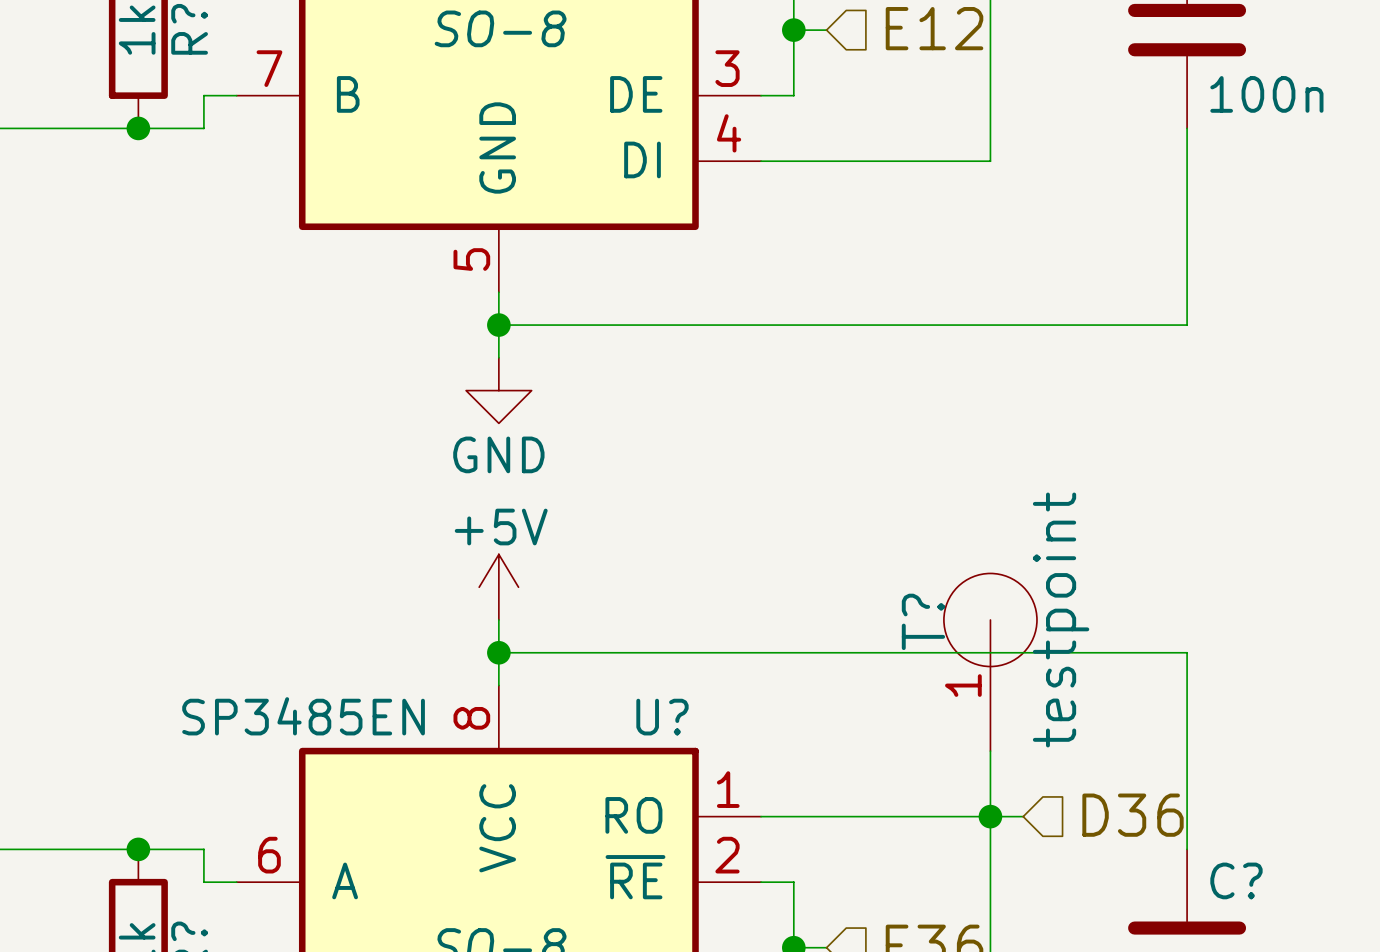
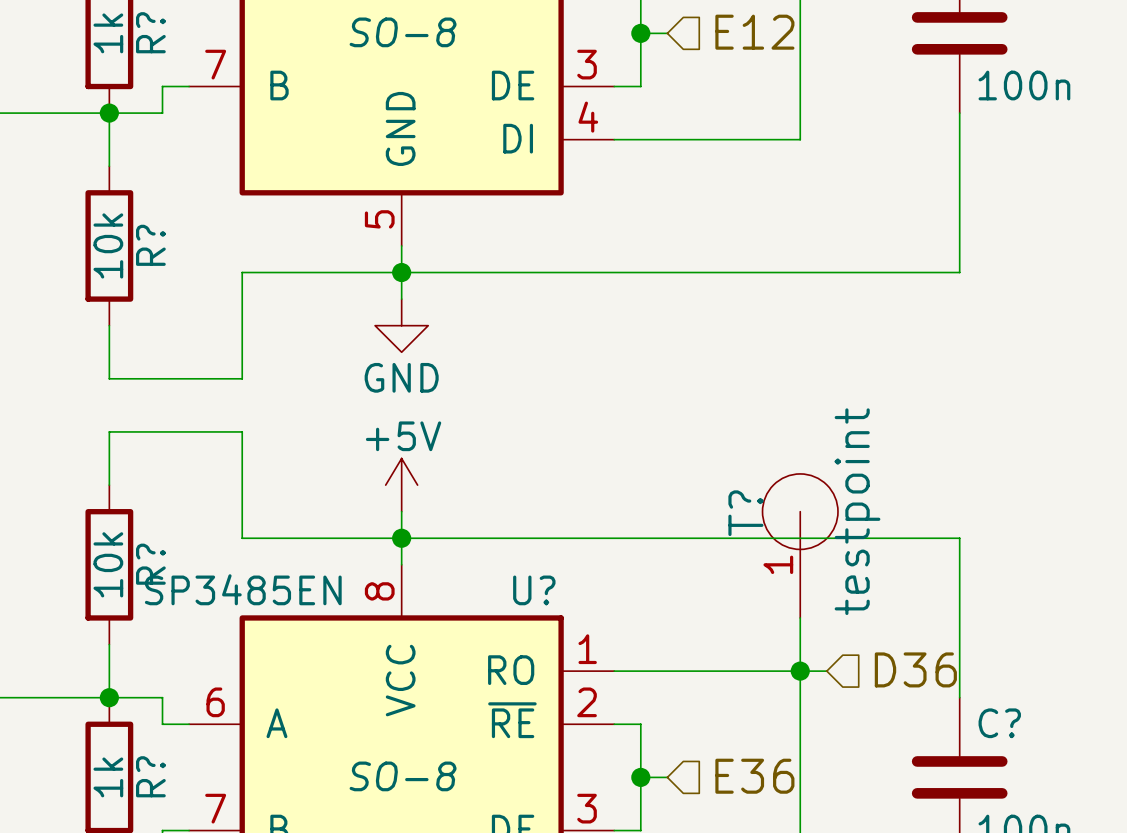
wire: none -> (109, 113) (109, 166)
R?: none -> 10k (109, 245)
wire: none -> (401, 272) (242, 272) (242, 378) (109, 378) (109, 325)
wire: none -> (109, 485) (109, 431) (242, 431) (242, 538) (401, 538)
R?: none -> 10k (109, 564)
wire: none -> (109, 644) (109, 697)

